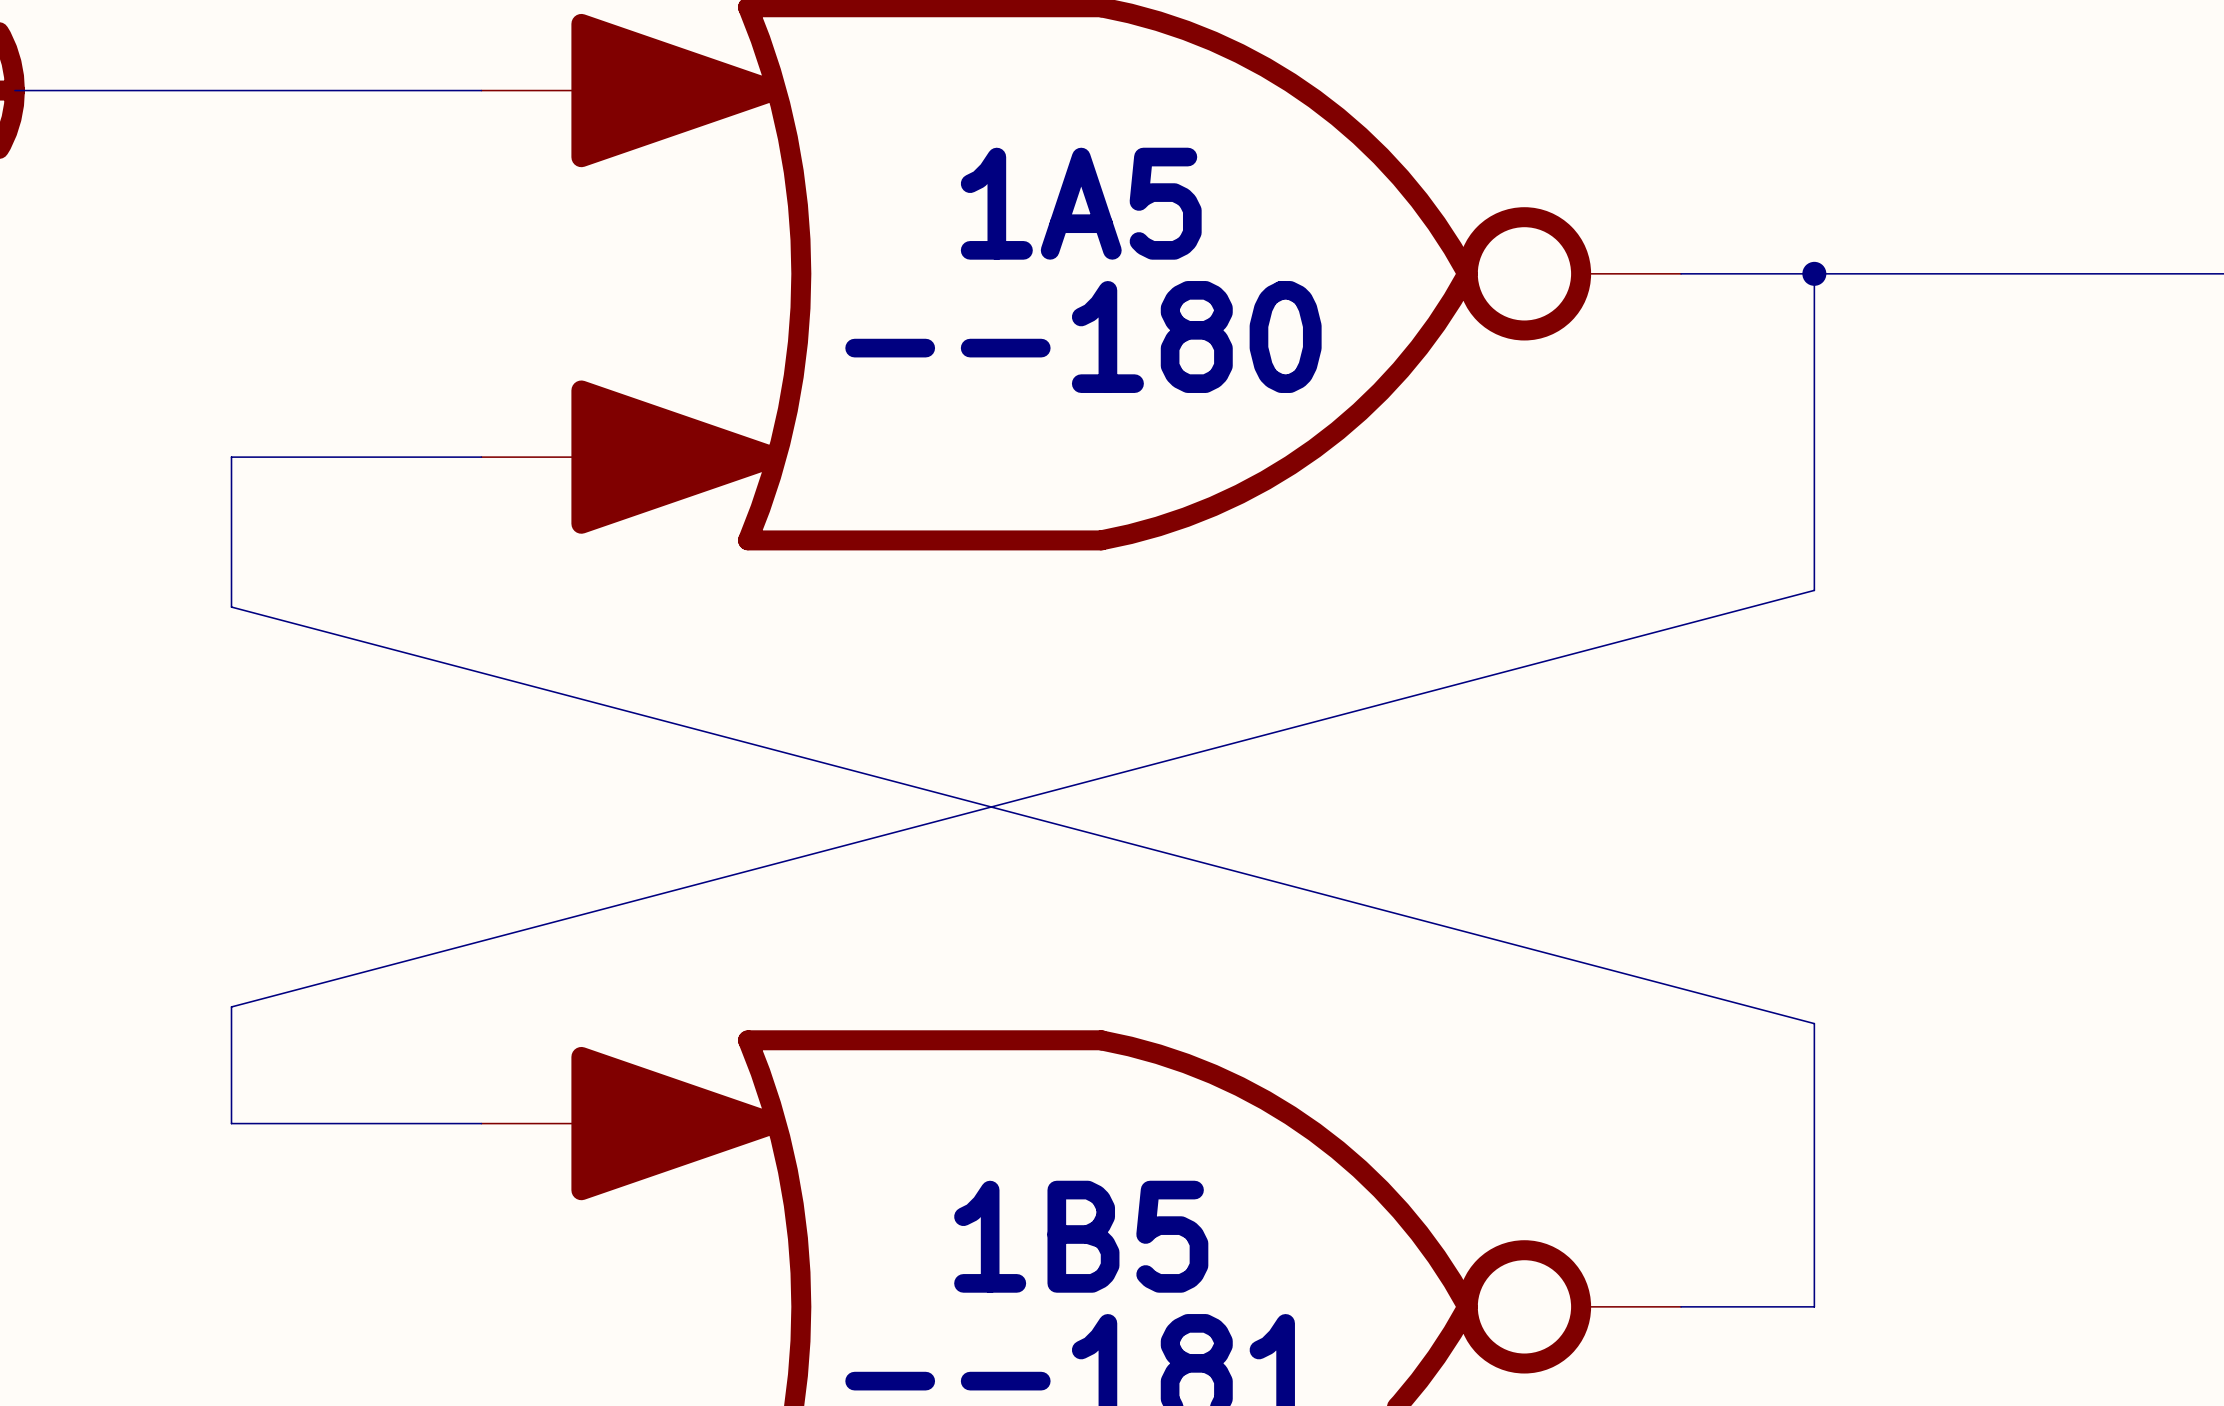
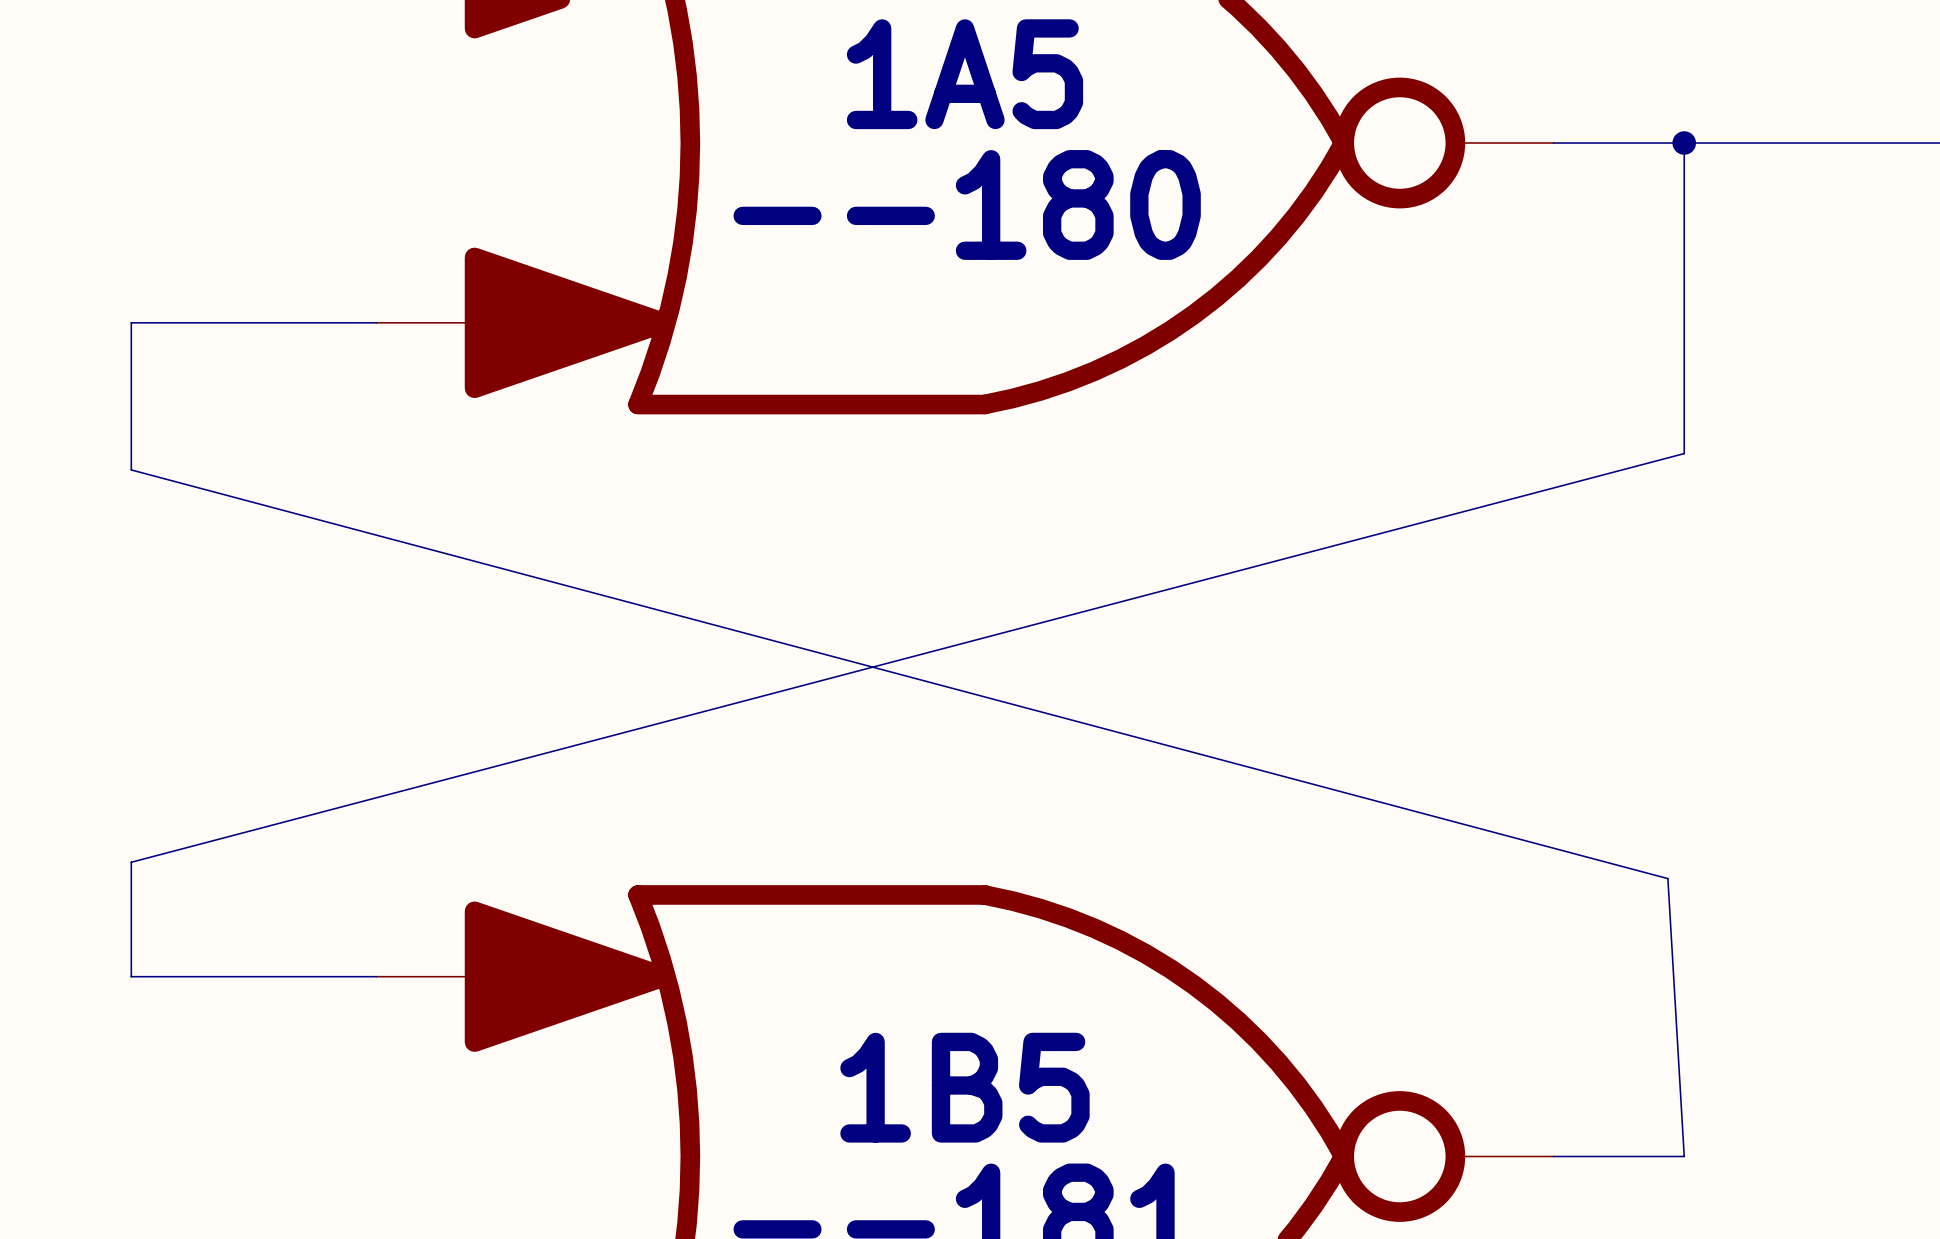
wire: (231, 607) (1814, 1023) (1814, 1306) -> (131, 469) (1667, 878) (1684, 1156)

